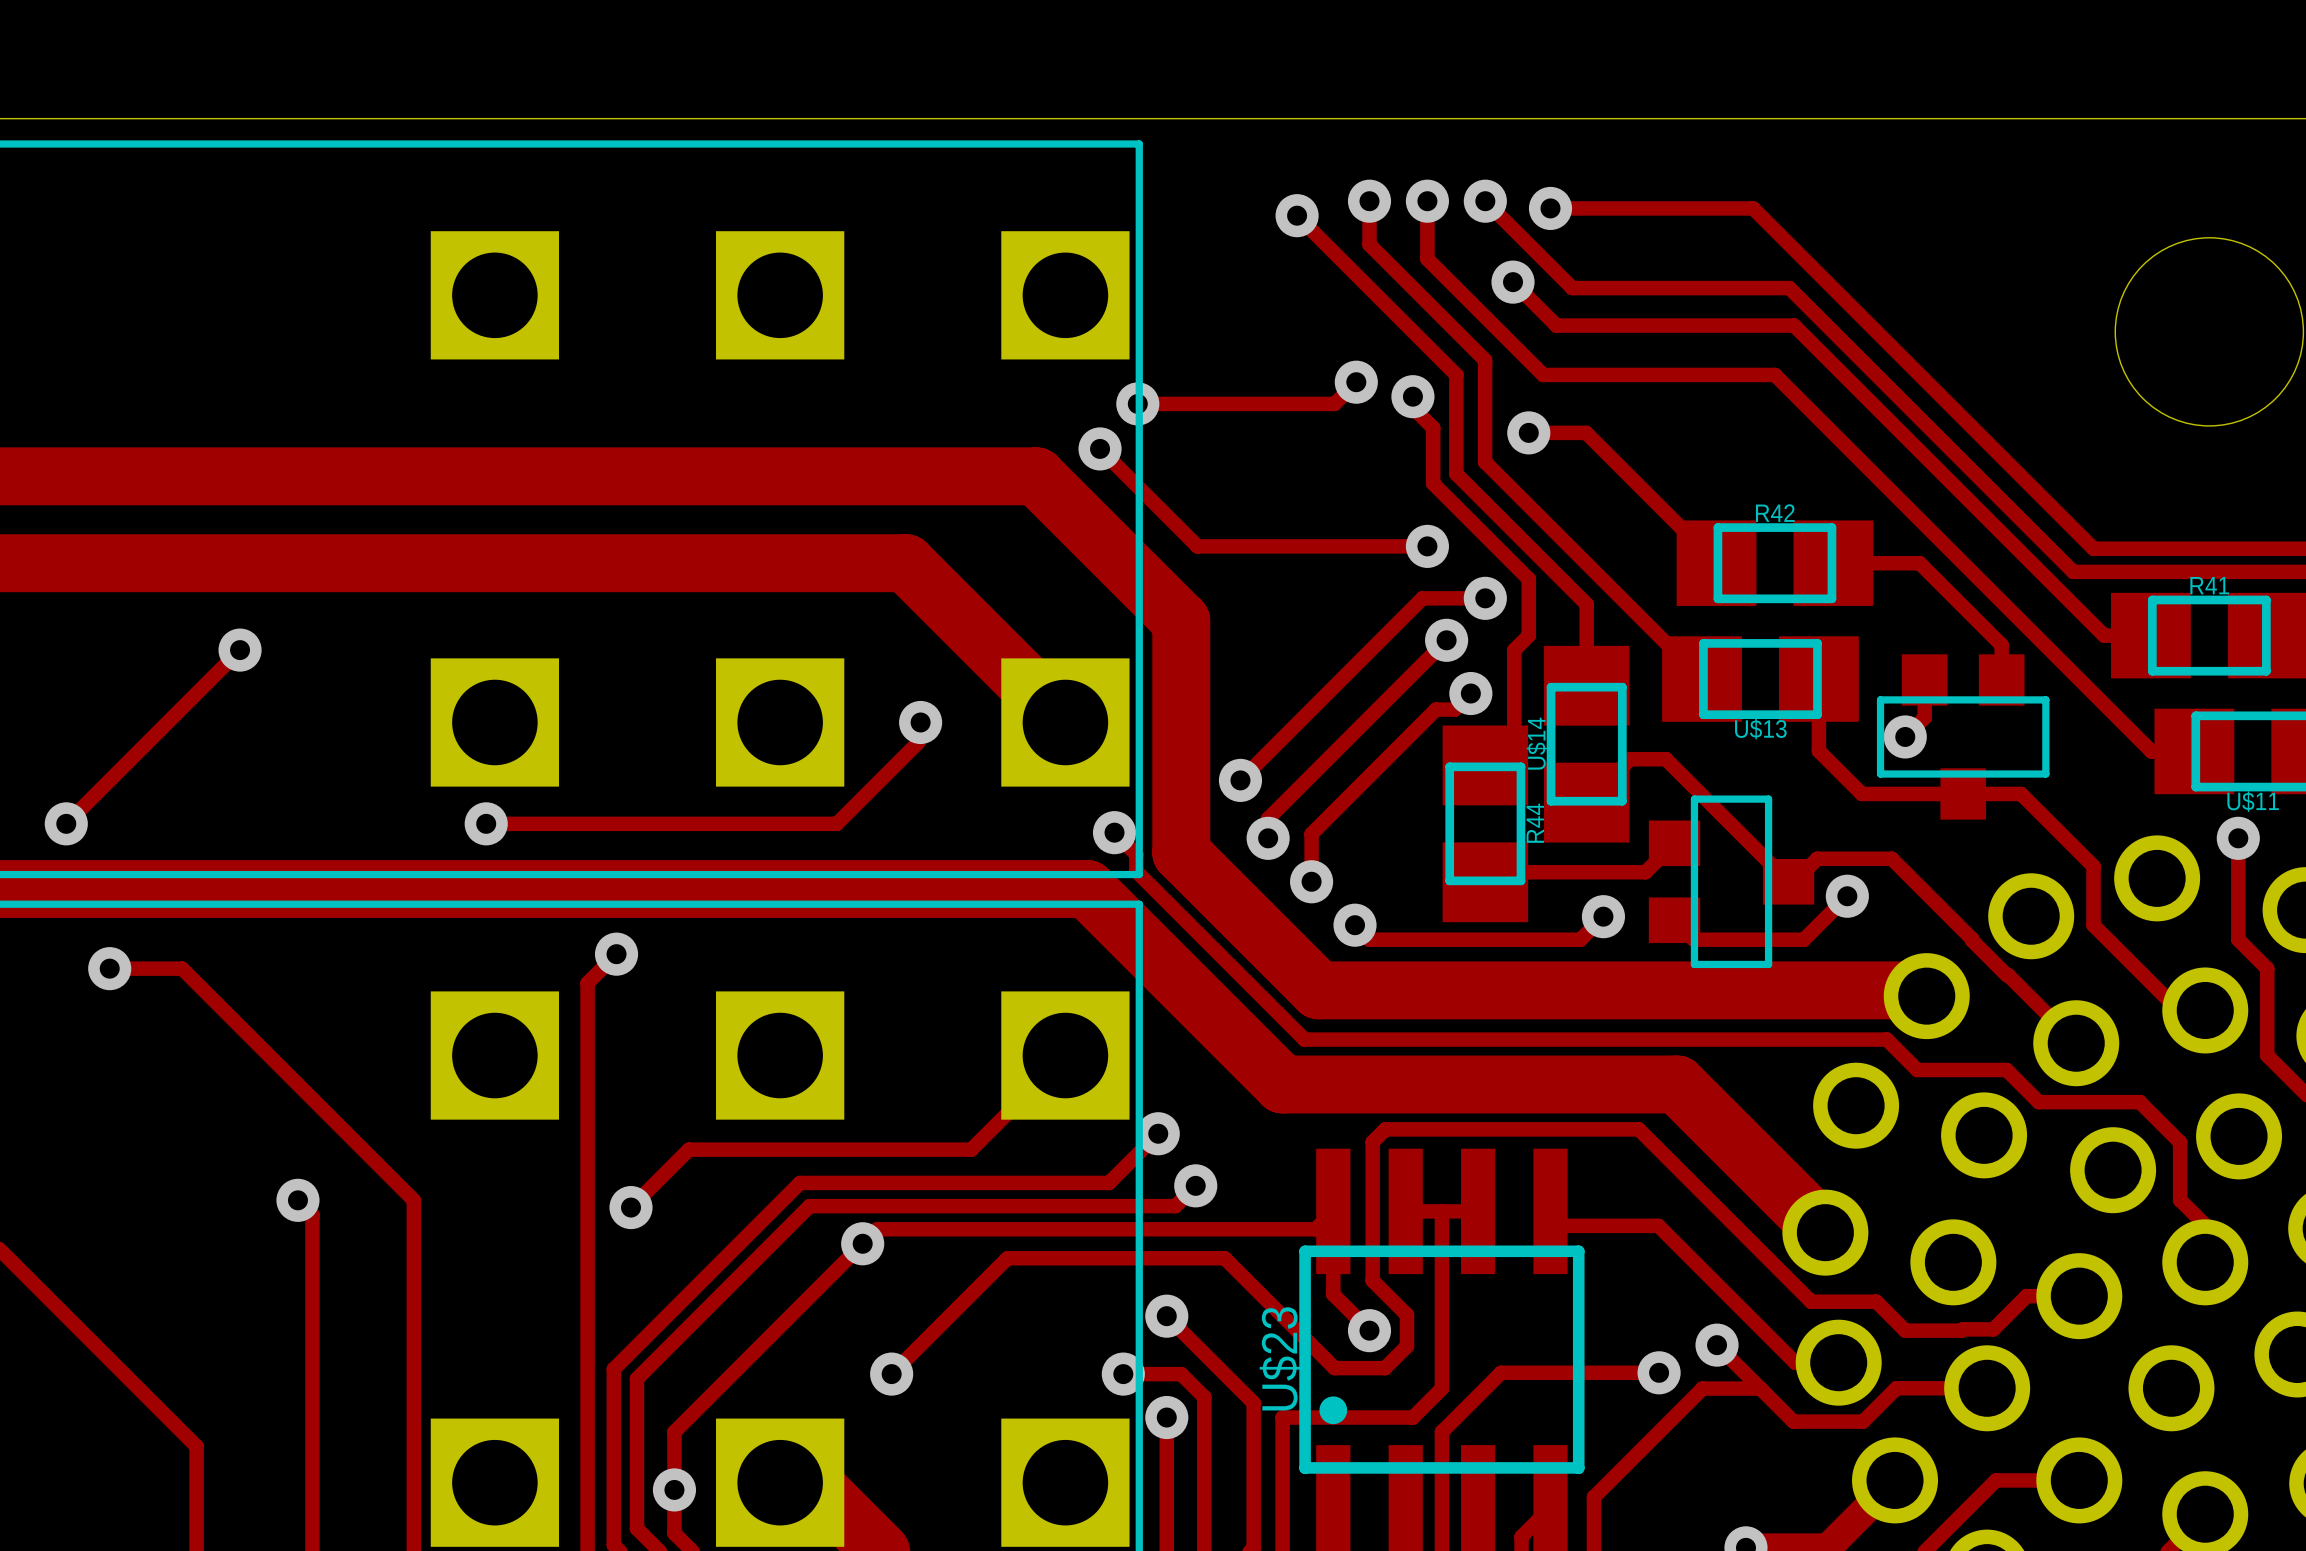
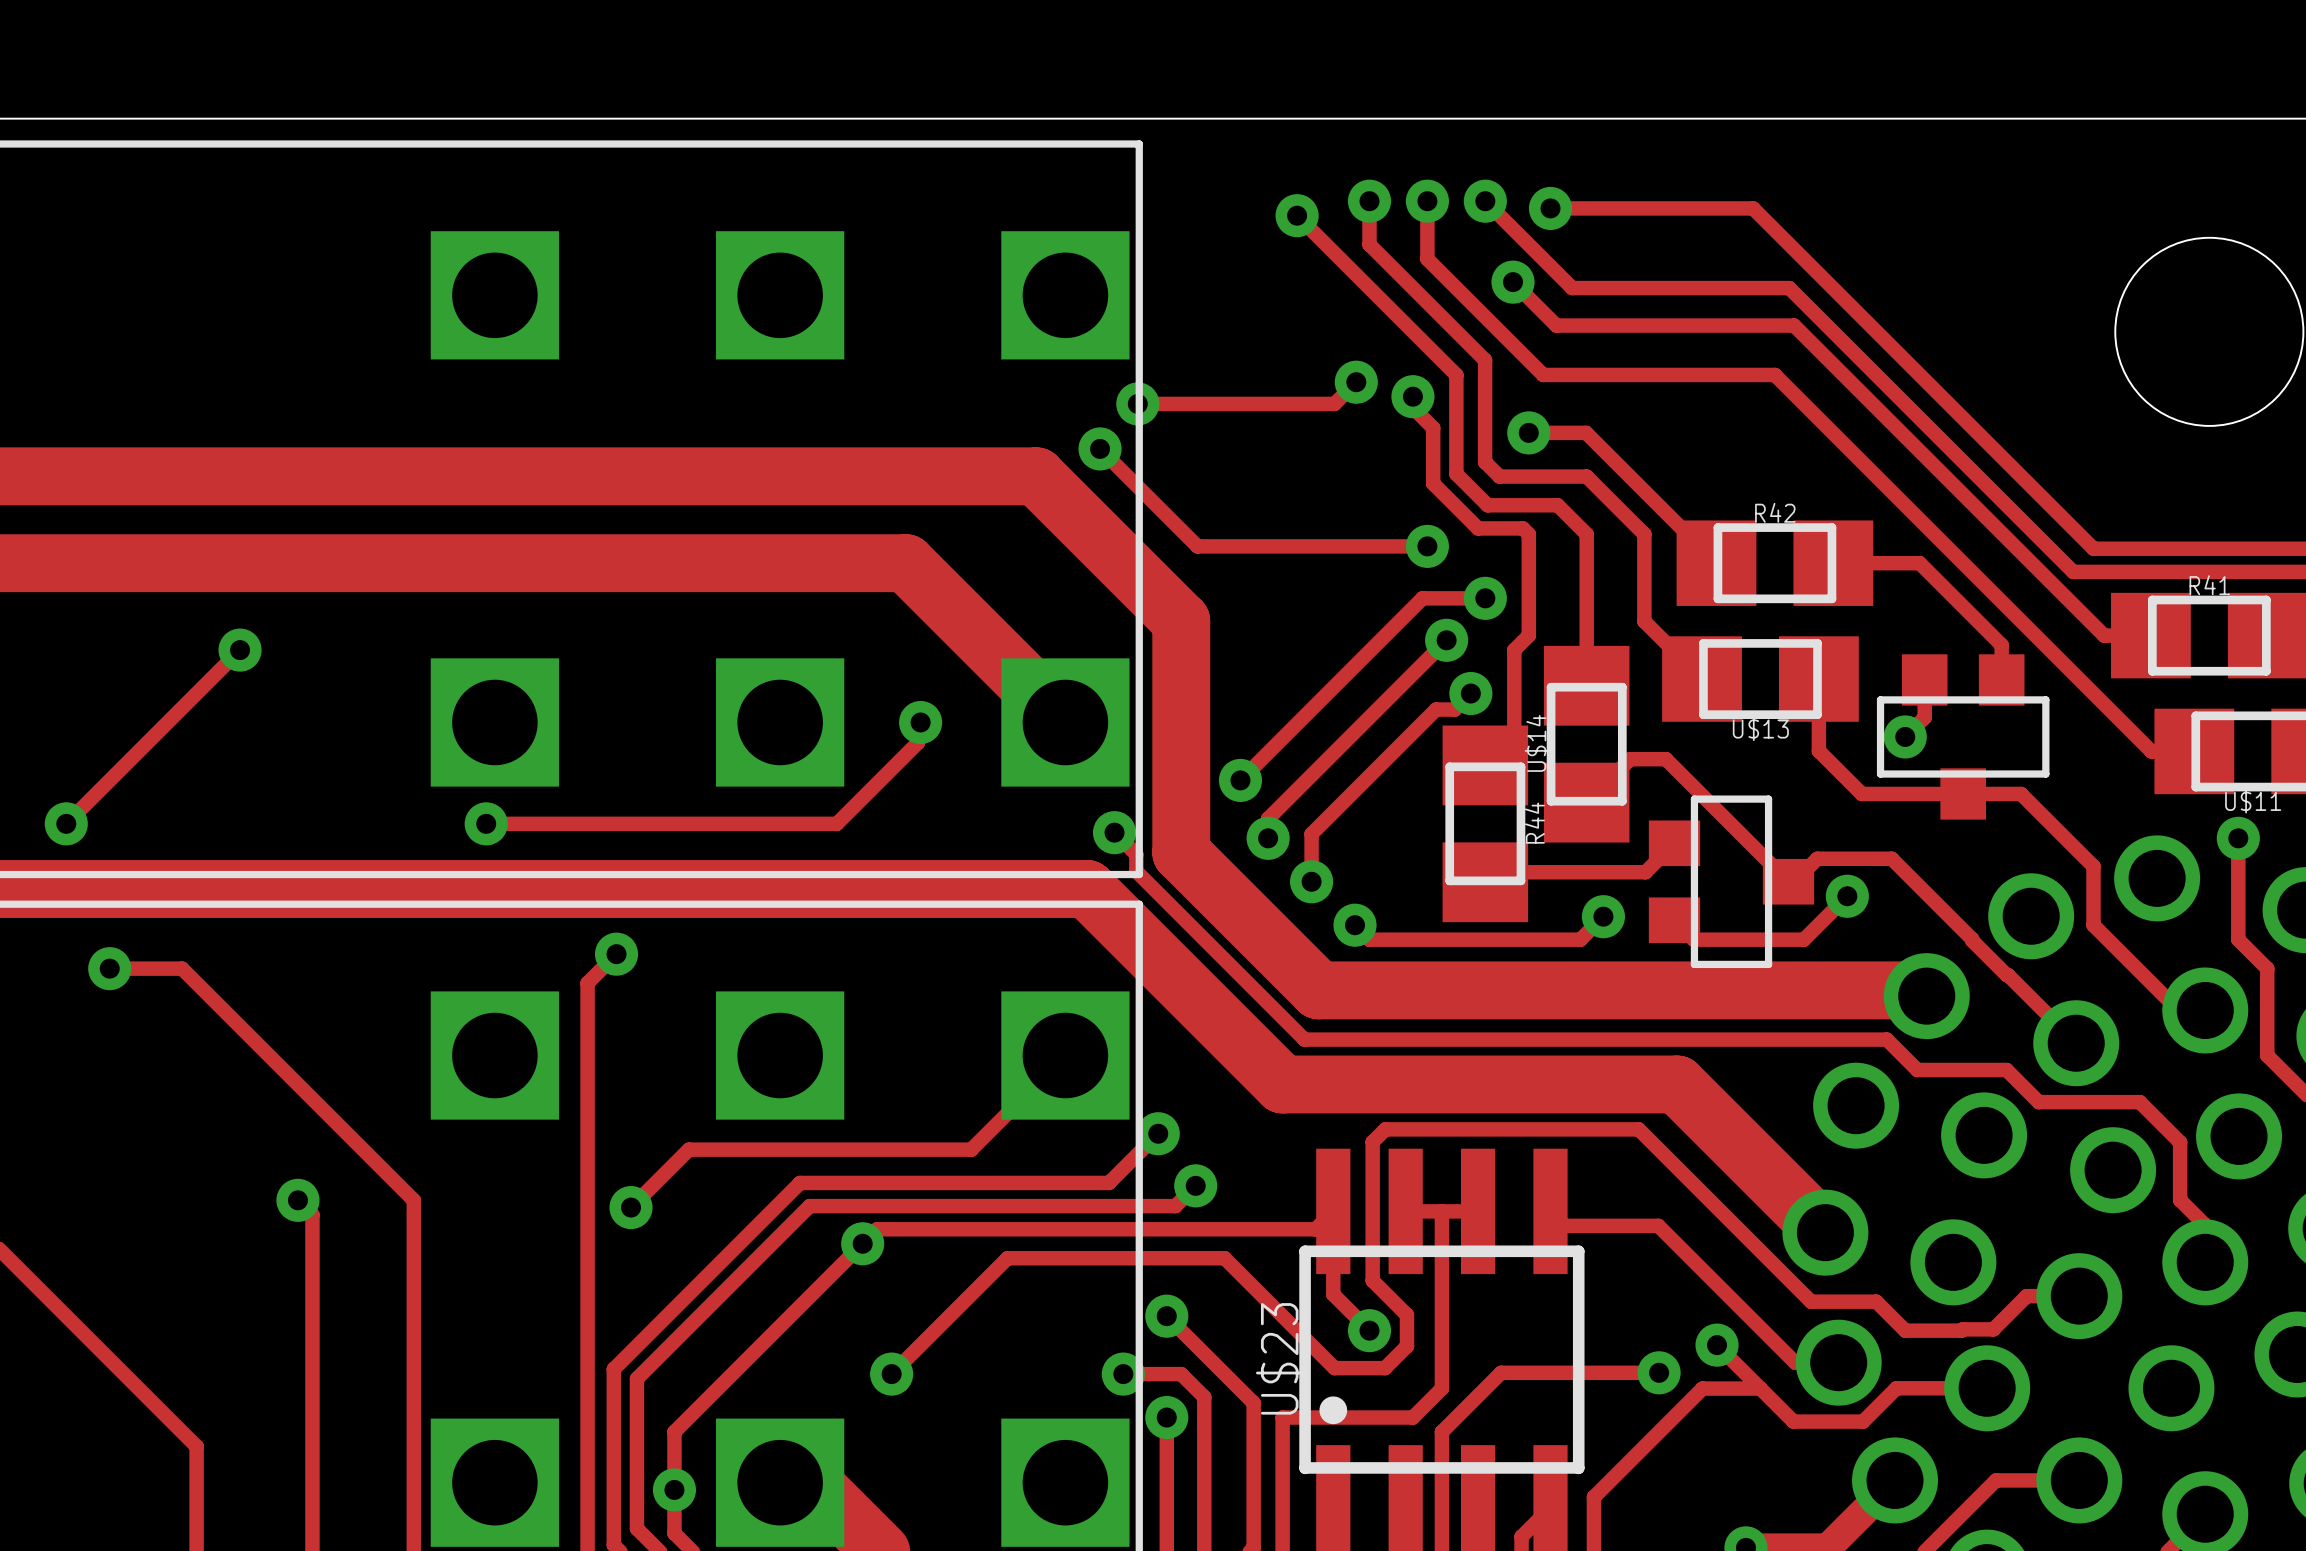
track: (1499, 476) (1644, 621) -> (1499, 476) (1586, 476) (1644, 534) (1644, 621)
track: (1487, 505) (1586, 604) -> (1487, 505) (1557, 505) (1586, 534) (1586, 604)
track: (1478, 528) (1528, 579) -> (1478, 528) (1522, 528) (1528, 534) (1528, 579)

